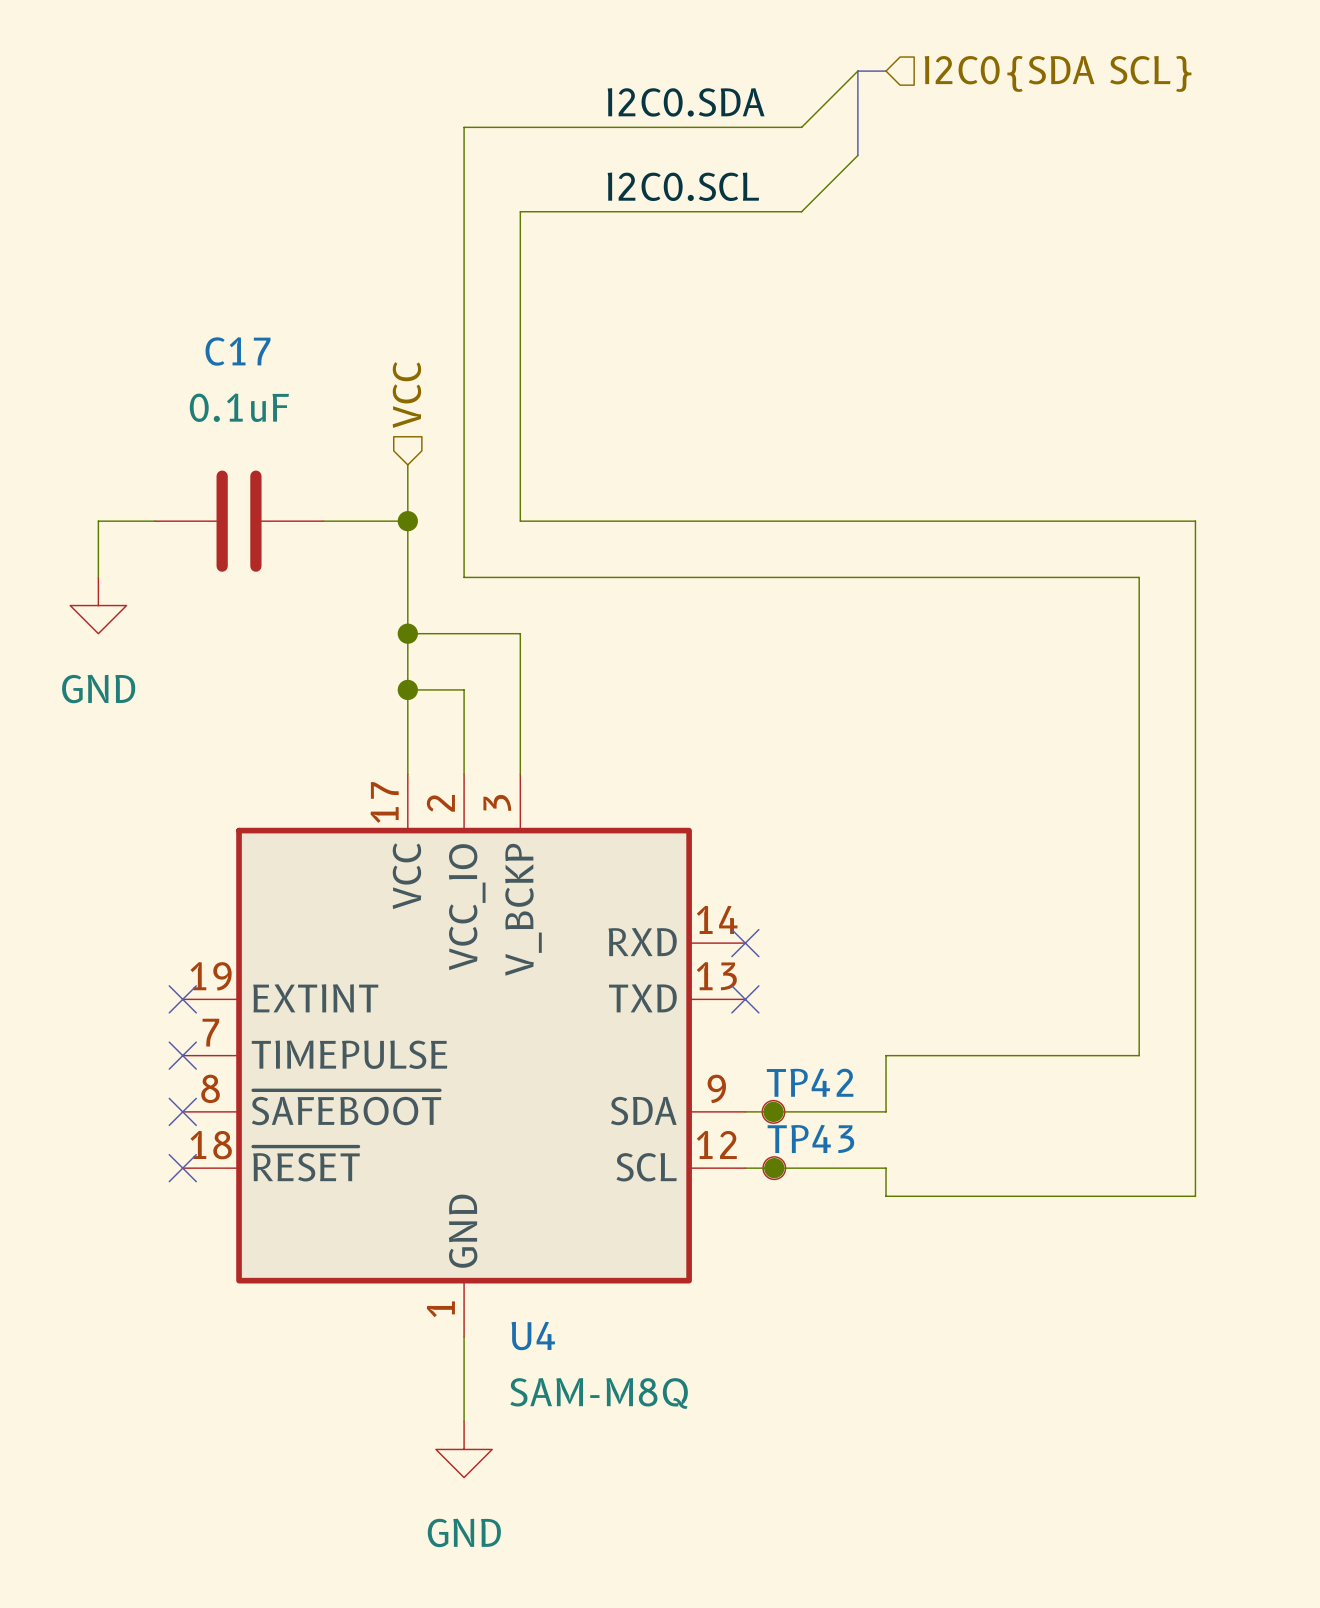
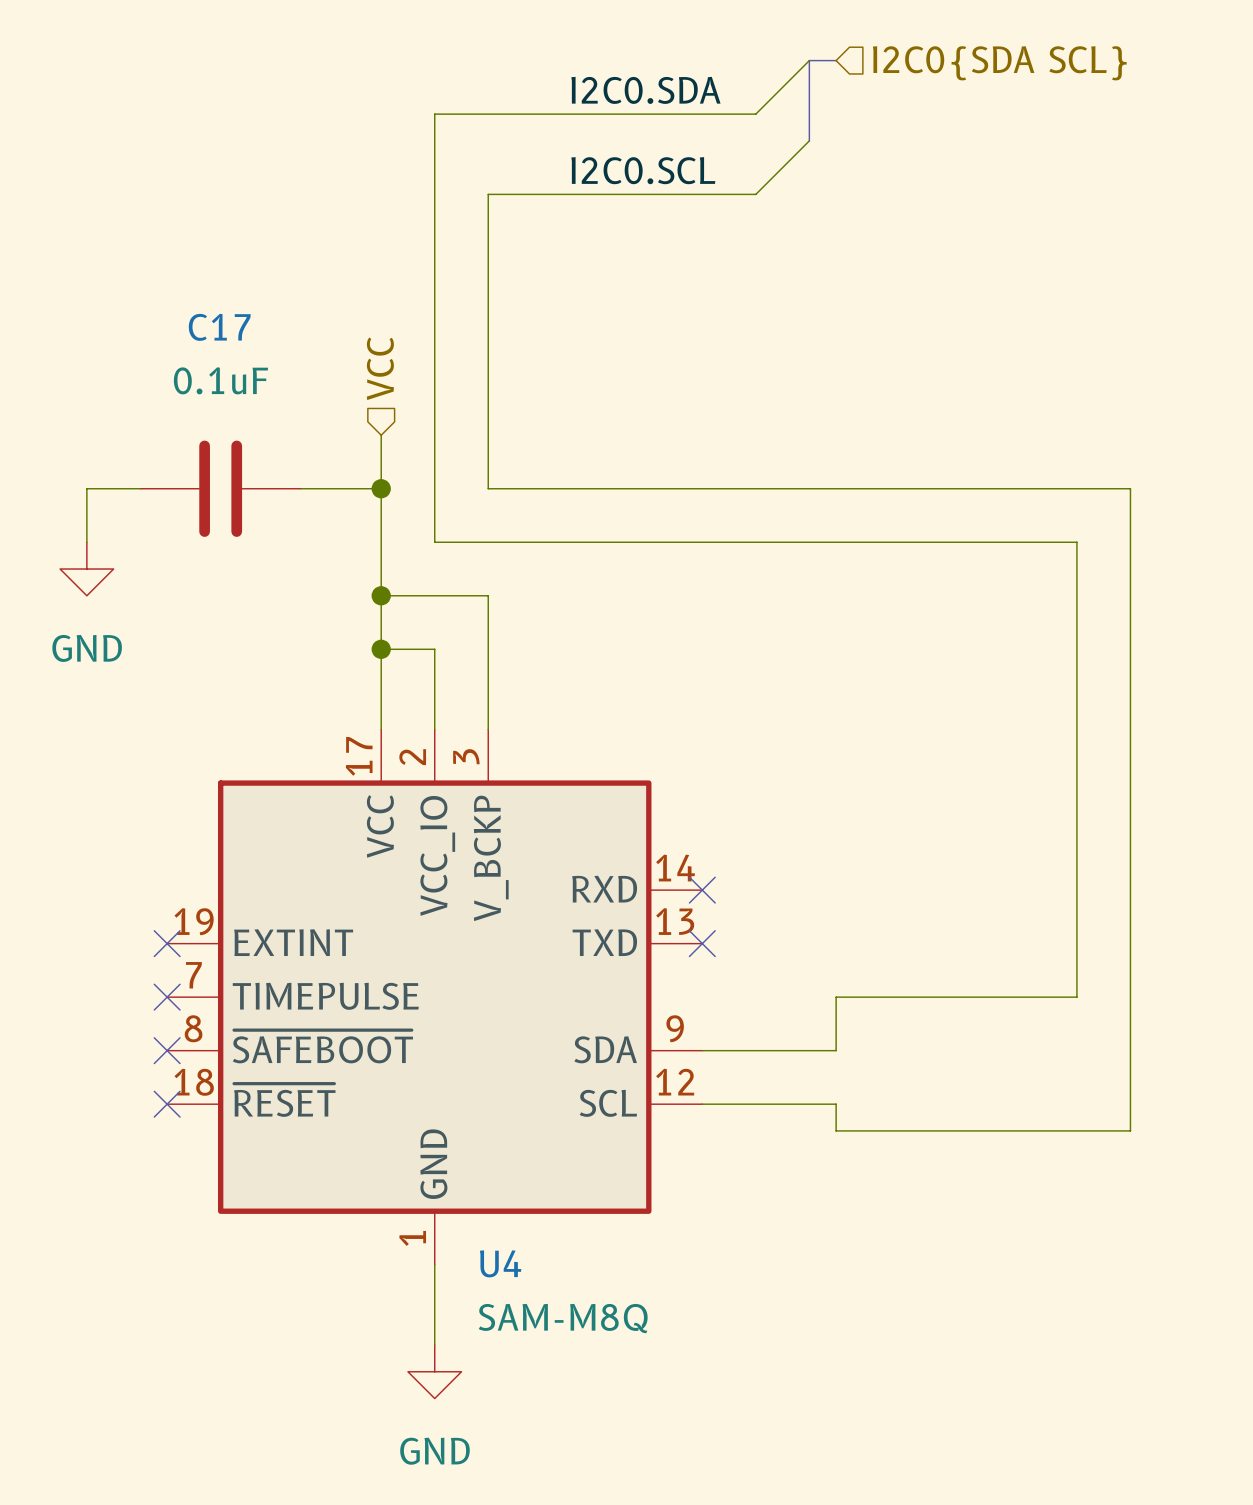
junction: (773, 1111) -> none
TP42: (773, 1111) -> none
junction: (774, 1168) -> none
TP43: (774, 1168) -> none

